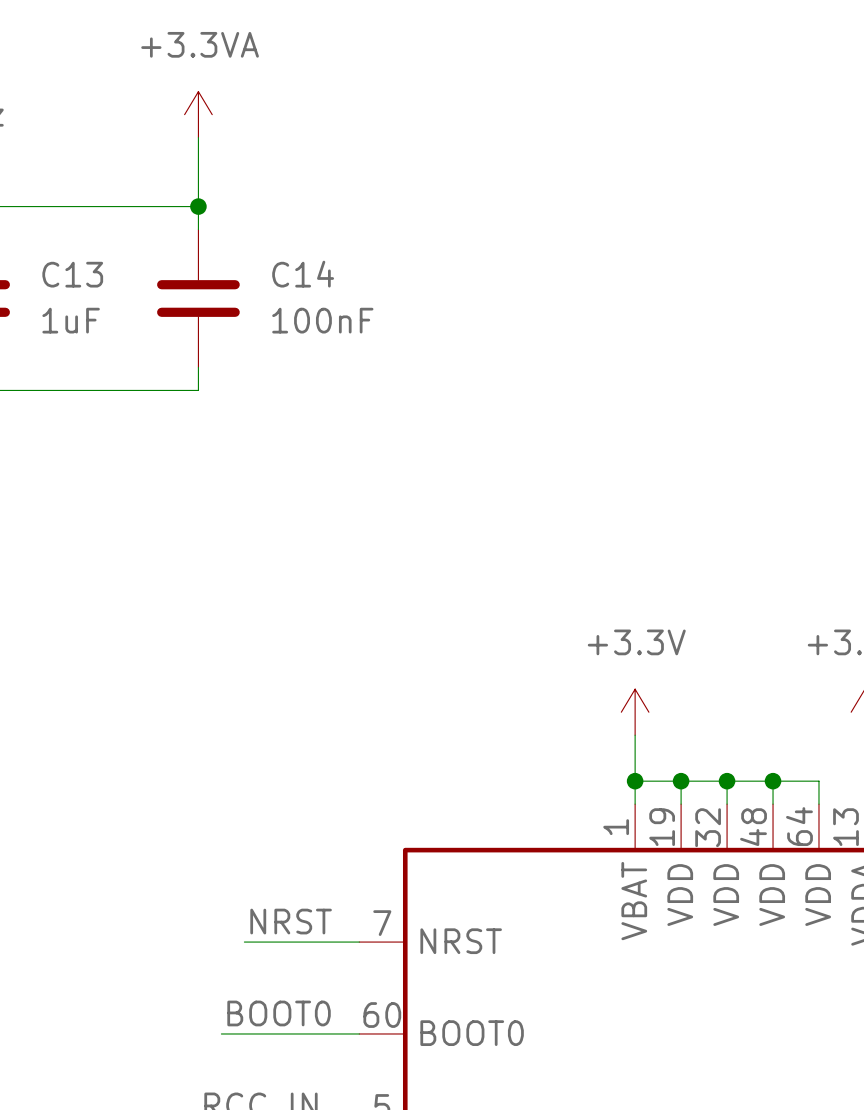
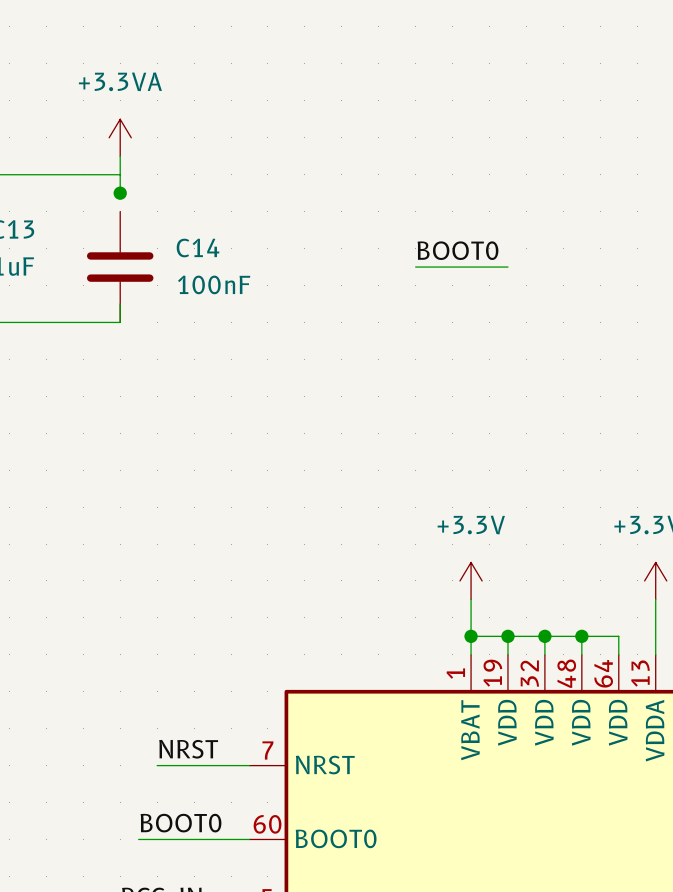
power symbol position: +3.3VA (198, 114) -> +3.3VA (120, 137)
junction position: (198, 206) -> (120, 193)
C14 position: (198, 298) -> (120, 267)
label: none -> BOOT0 (457, 250)
wire: none -> (415, 267) (507, 267)

